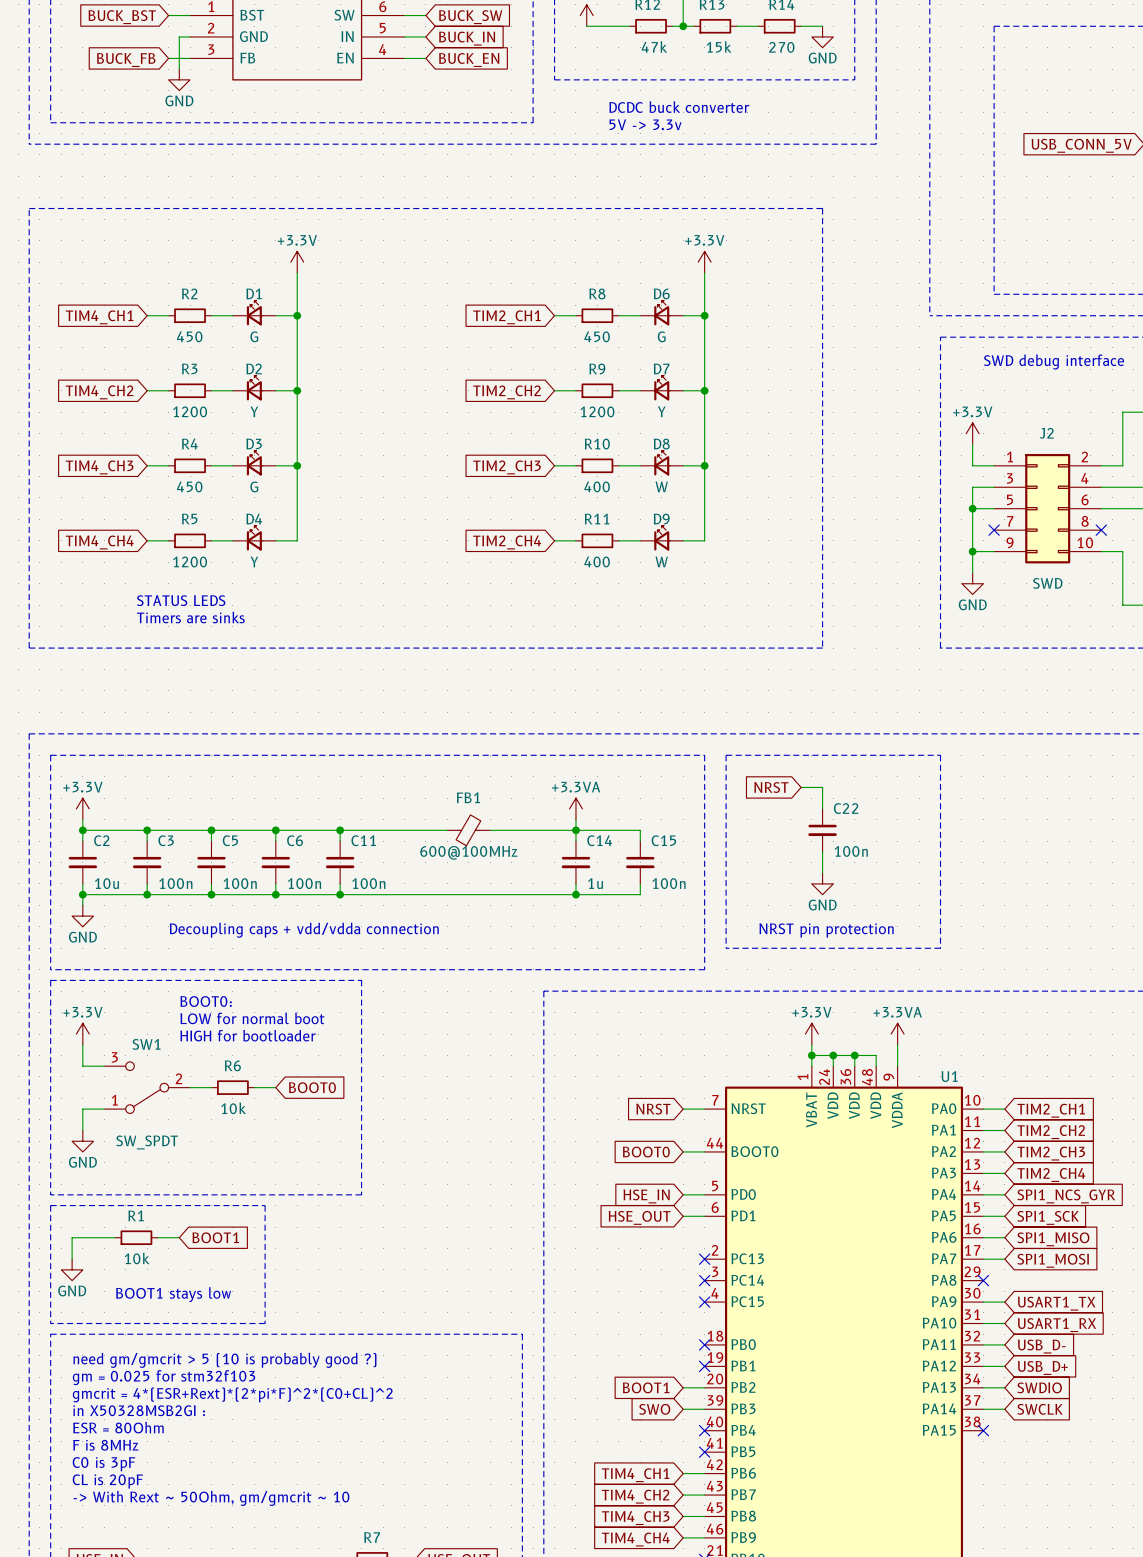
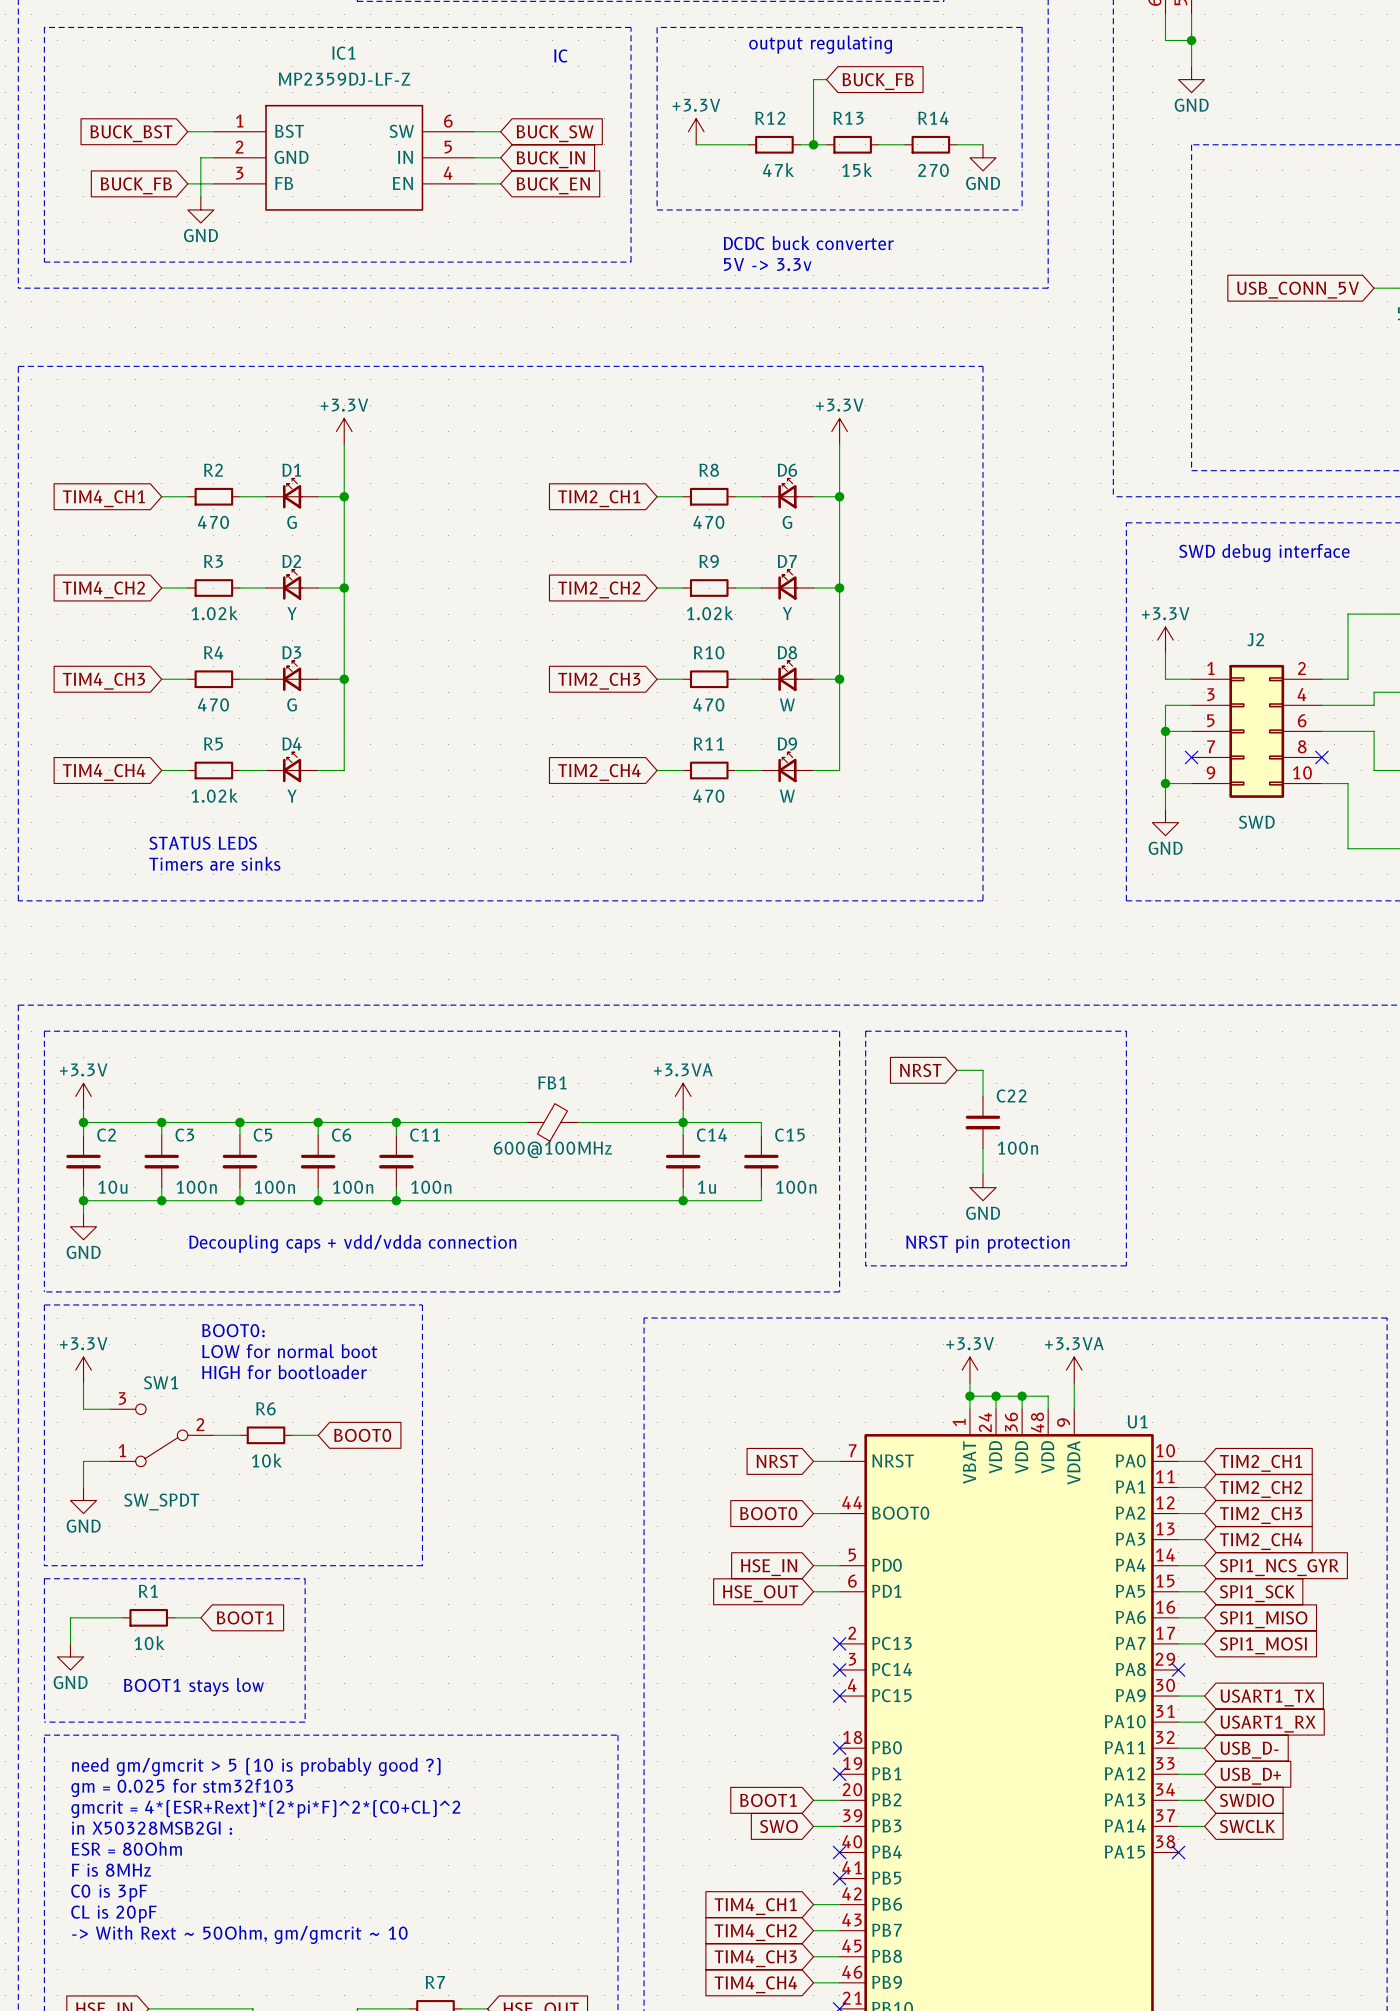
R2 value: 450 (189, 336) -> 470 (213, 522)
R8 value: 450 (597, 336) -> 470 (708, 522)
R3 value: 1200 (190, 411) -> 1.02k (214, 613)
R9 value: 1200 (597, 411) -> 1.02k (710, 613)
R4 value: 450 (189, 486) -> 470 (213, 704)
R10 value: 400 (597, 486) -> 470 (708, 704)
R5 value: 1200 (190, 561) -> 1.02k (214, 795)
R11 value: 400 (597, 561) -> 470 (708, 796)

